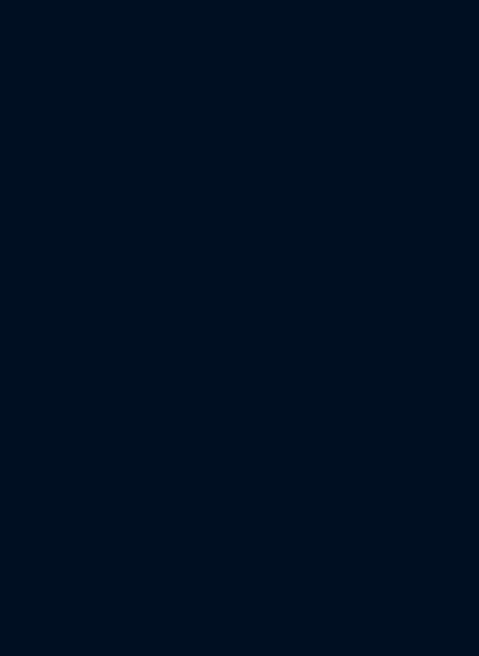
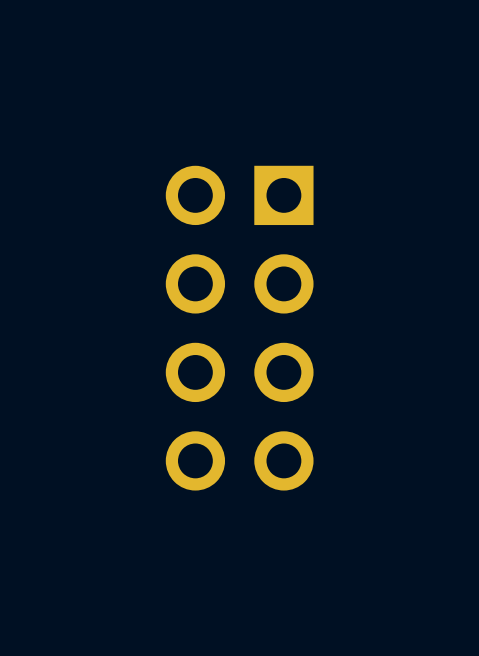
part: none -> (239, 328)

